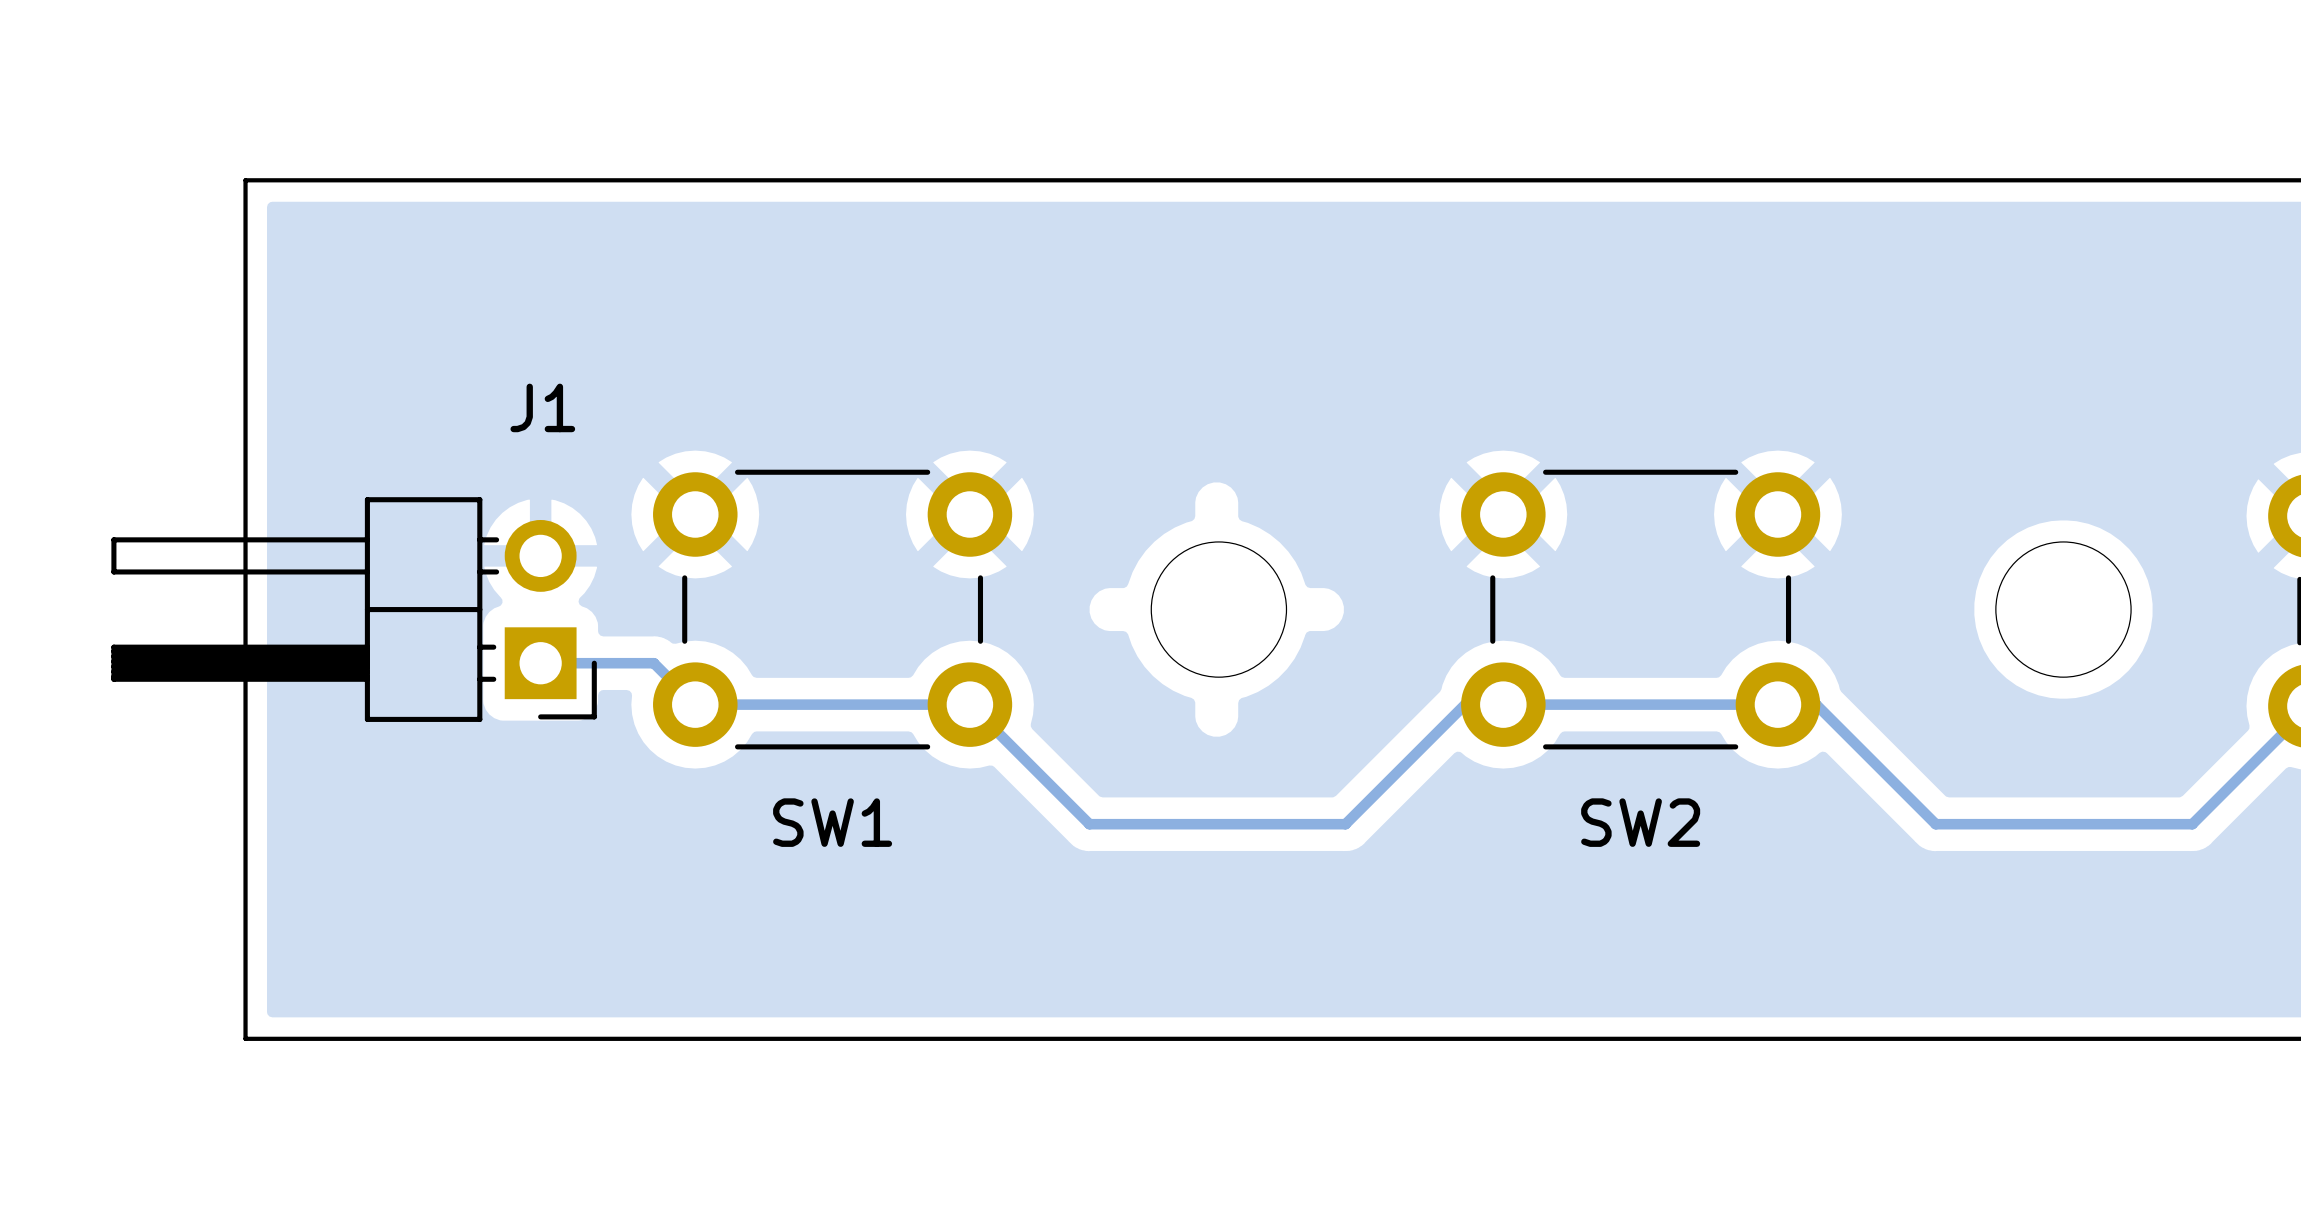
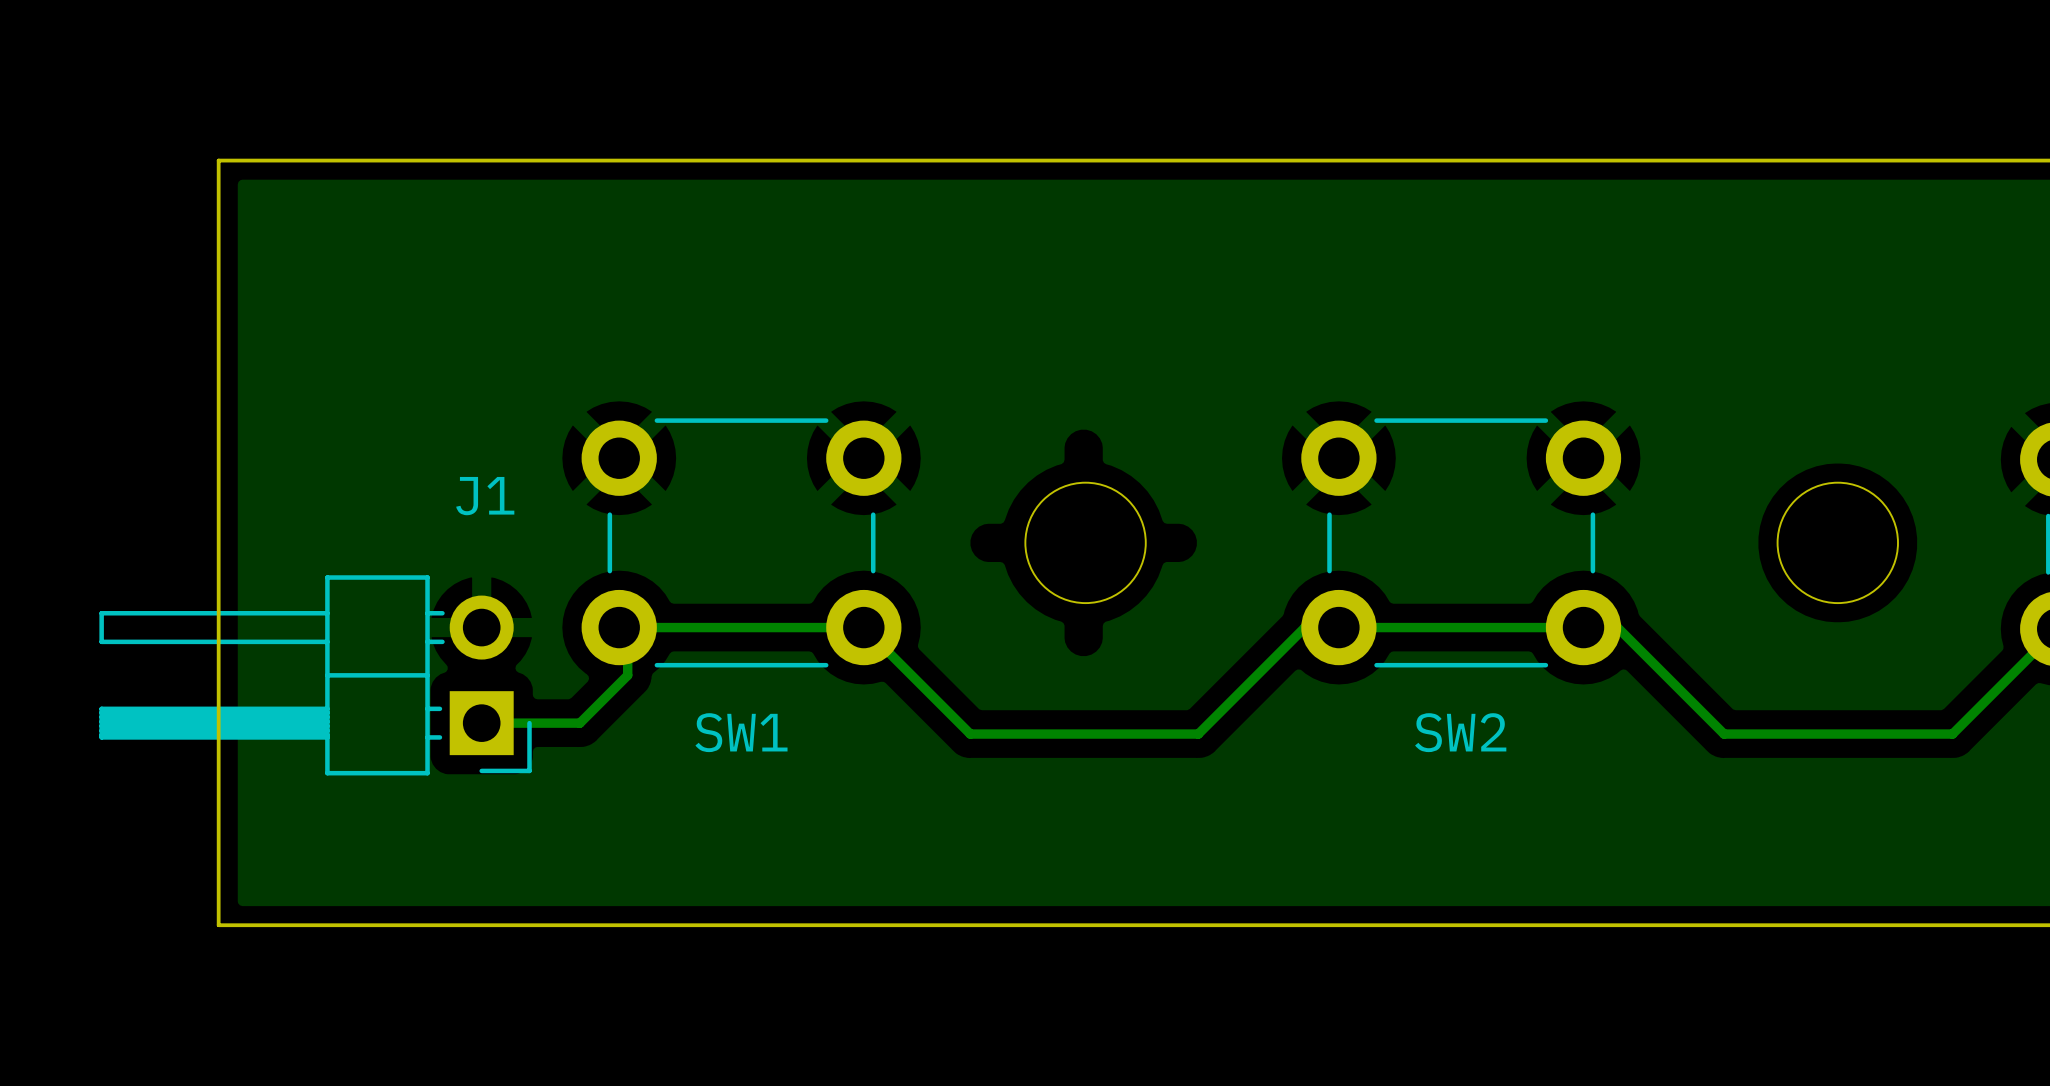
J1 position: (354, 609) -> (315, 675)
bottom track: (540, 663) (653, 663) (695, 704) -> (481, 723) (579, 723) (627, 675) (627, 636) (619, 627)

